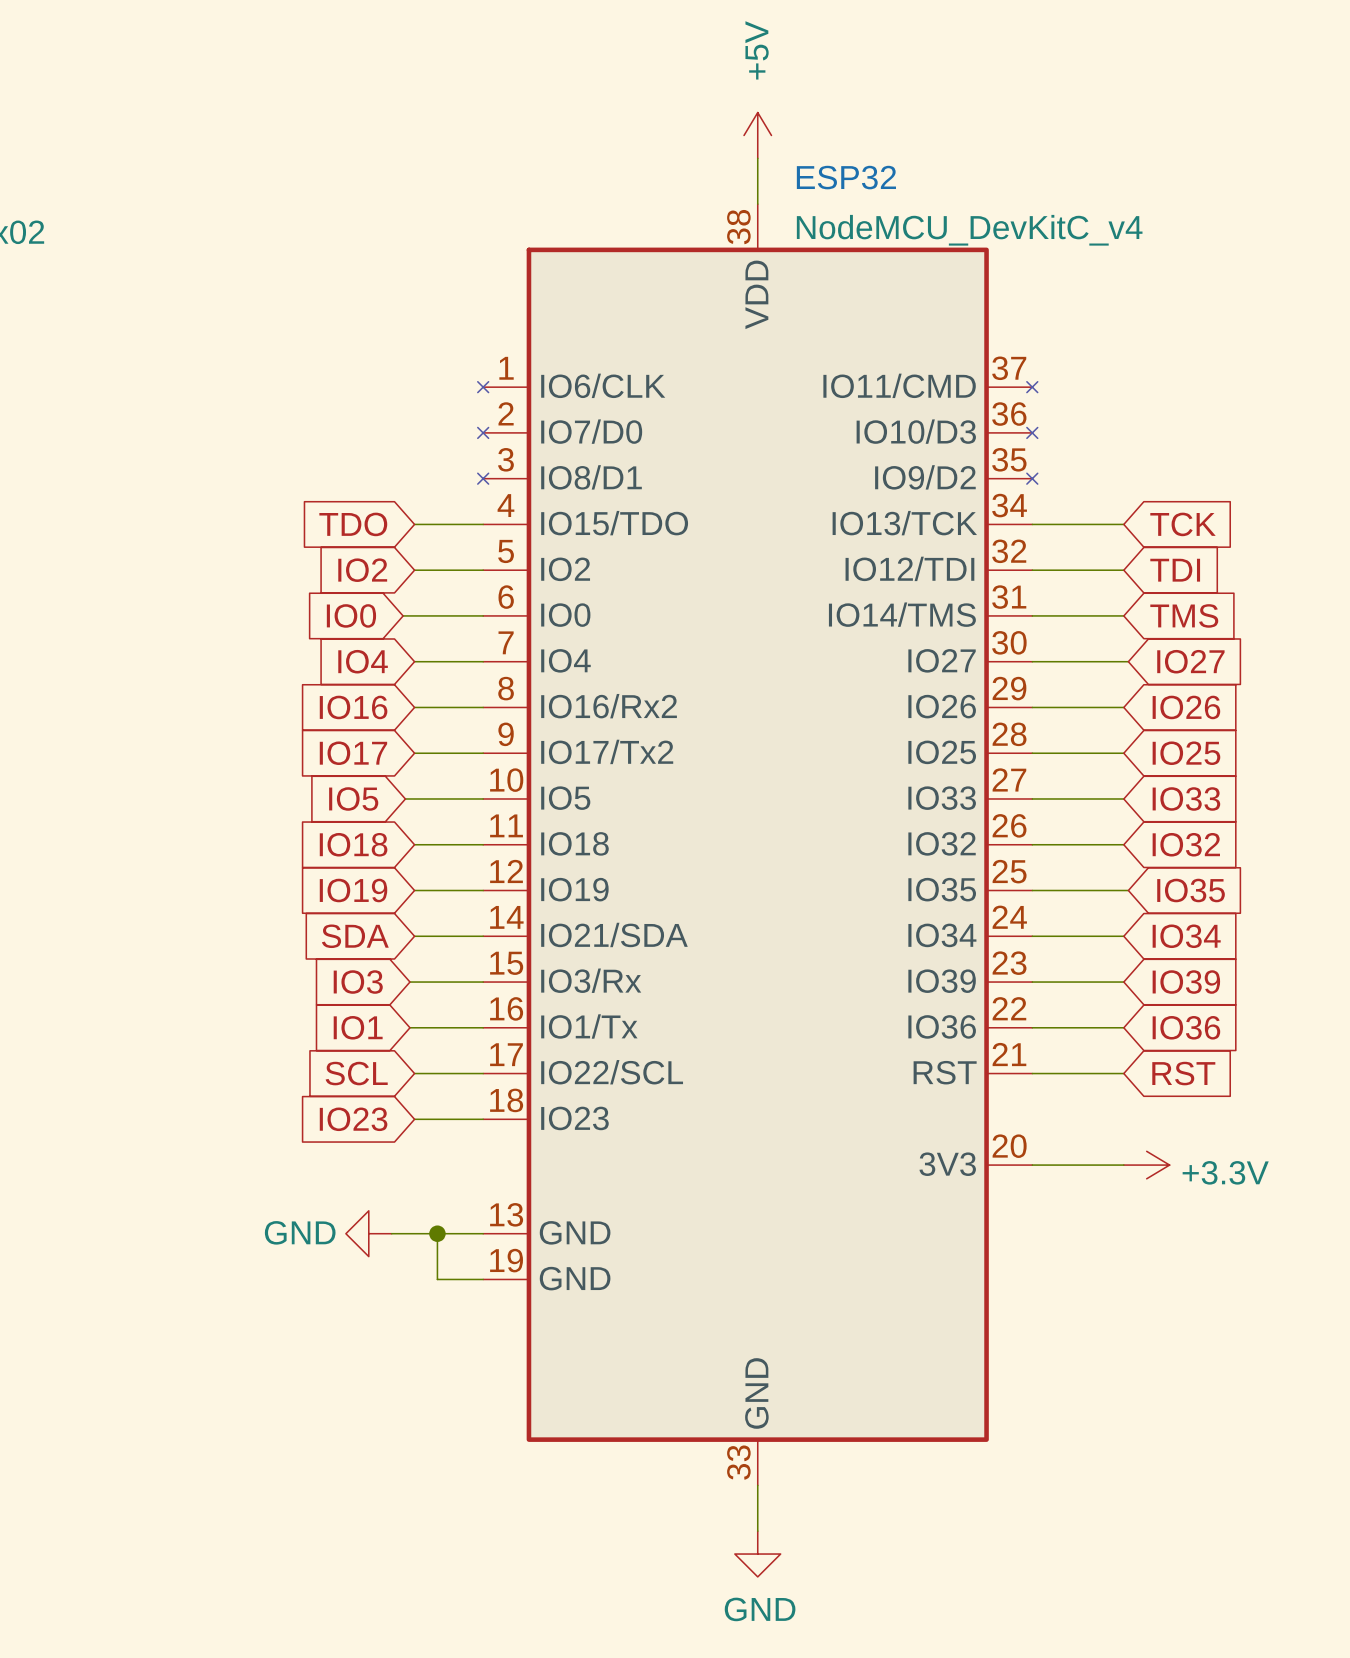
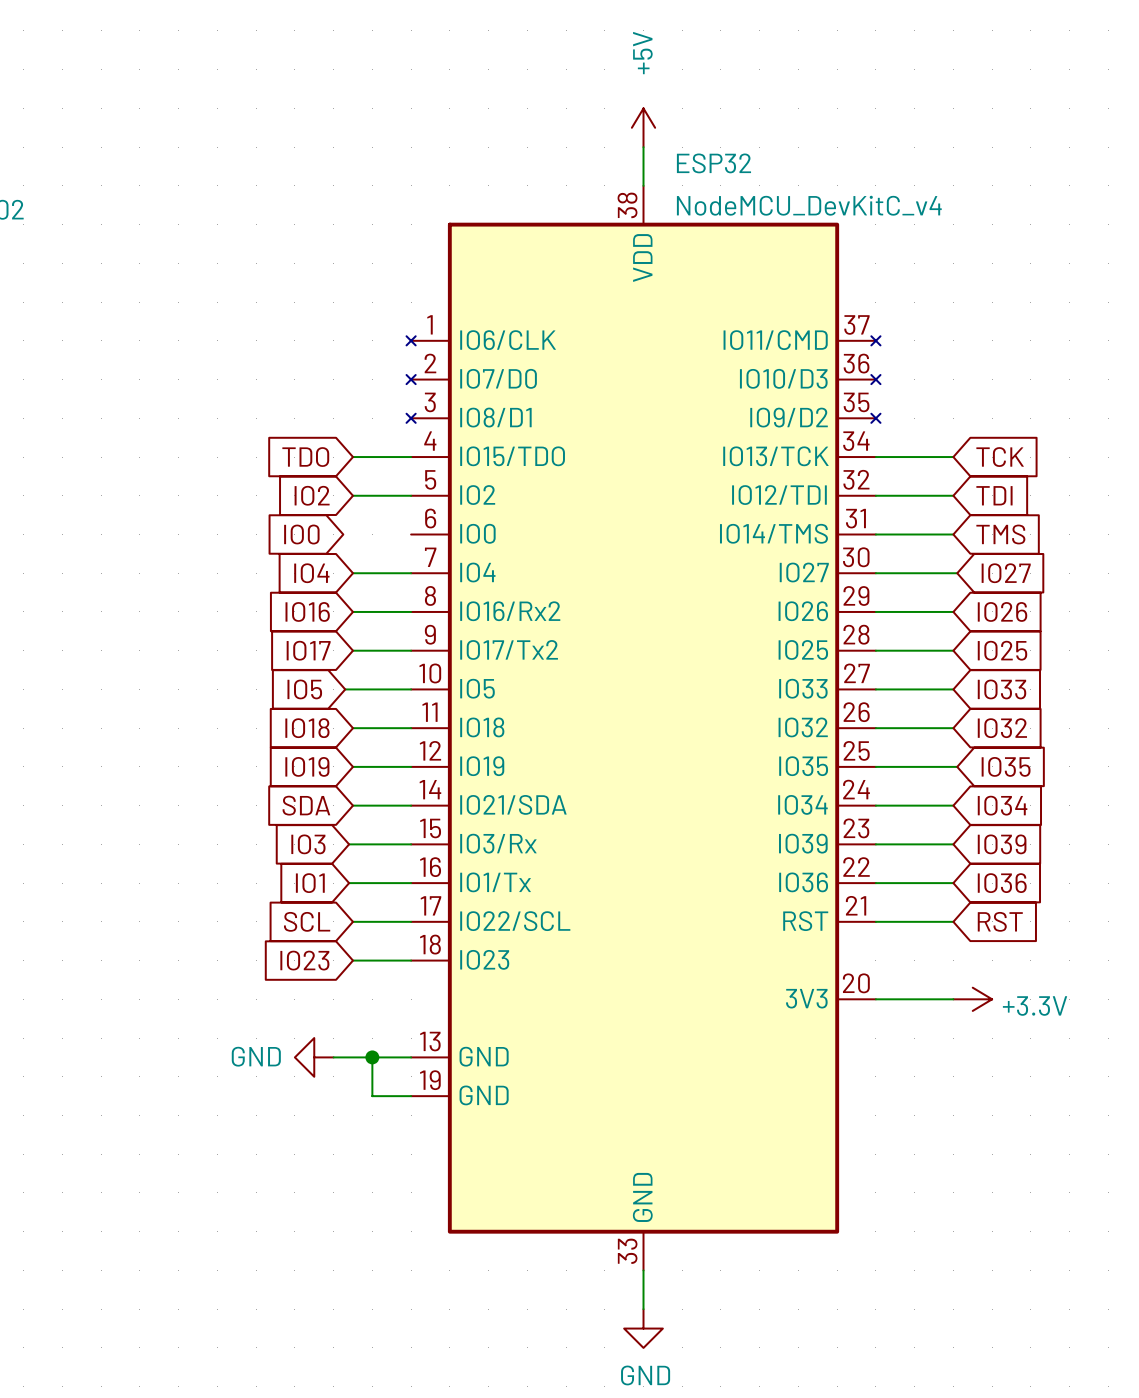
wire: (403, 615) (483, 615) -> none

